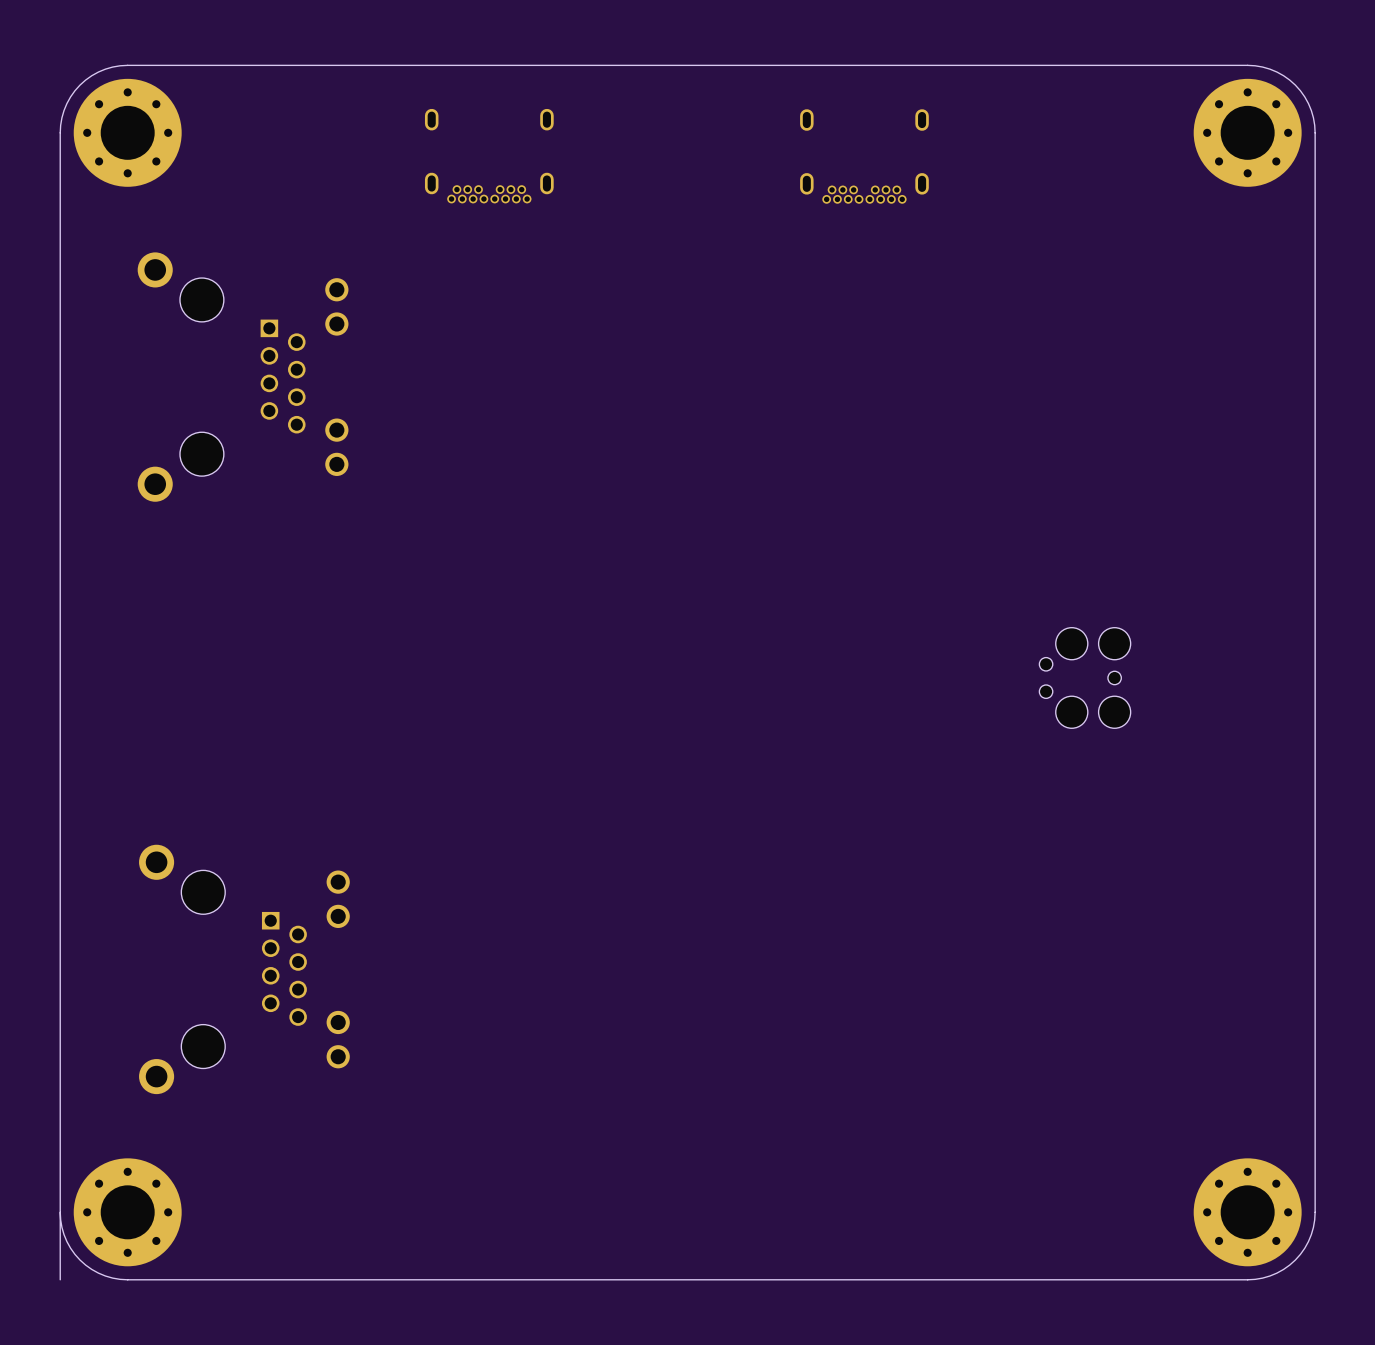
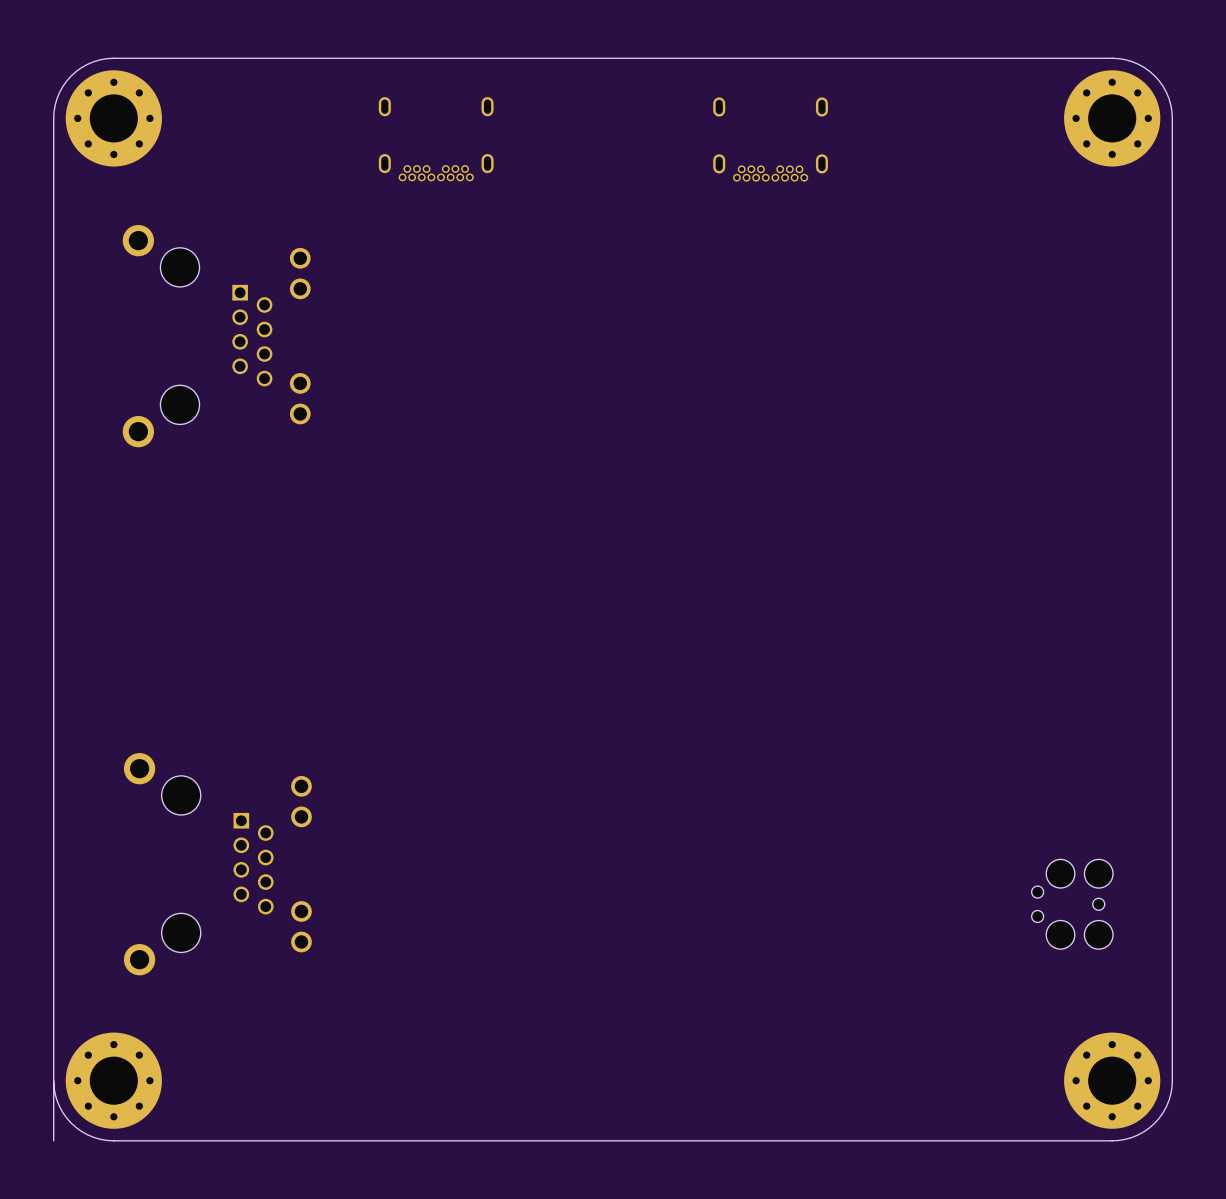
part: (1085, 677) -> none
part: none -> (1072, 904)

